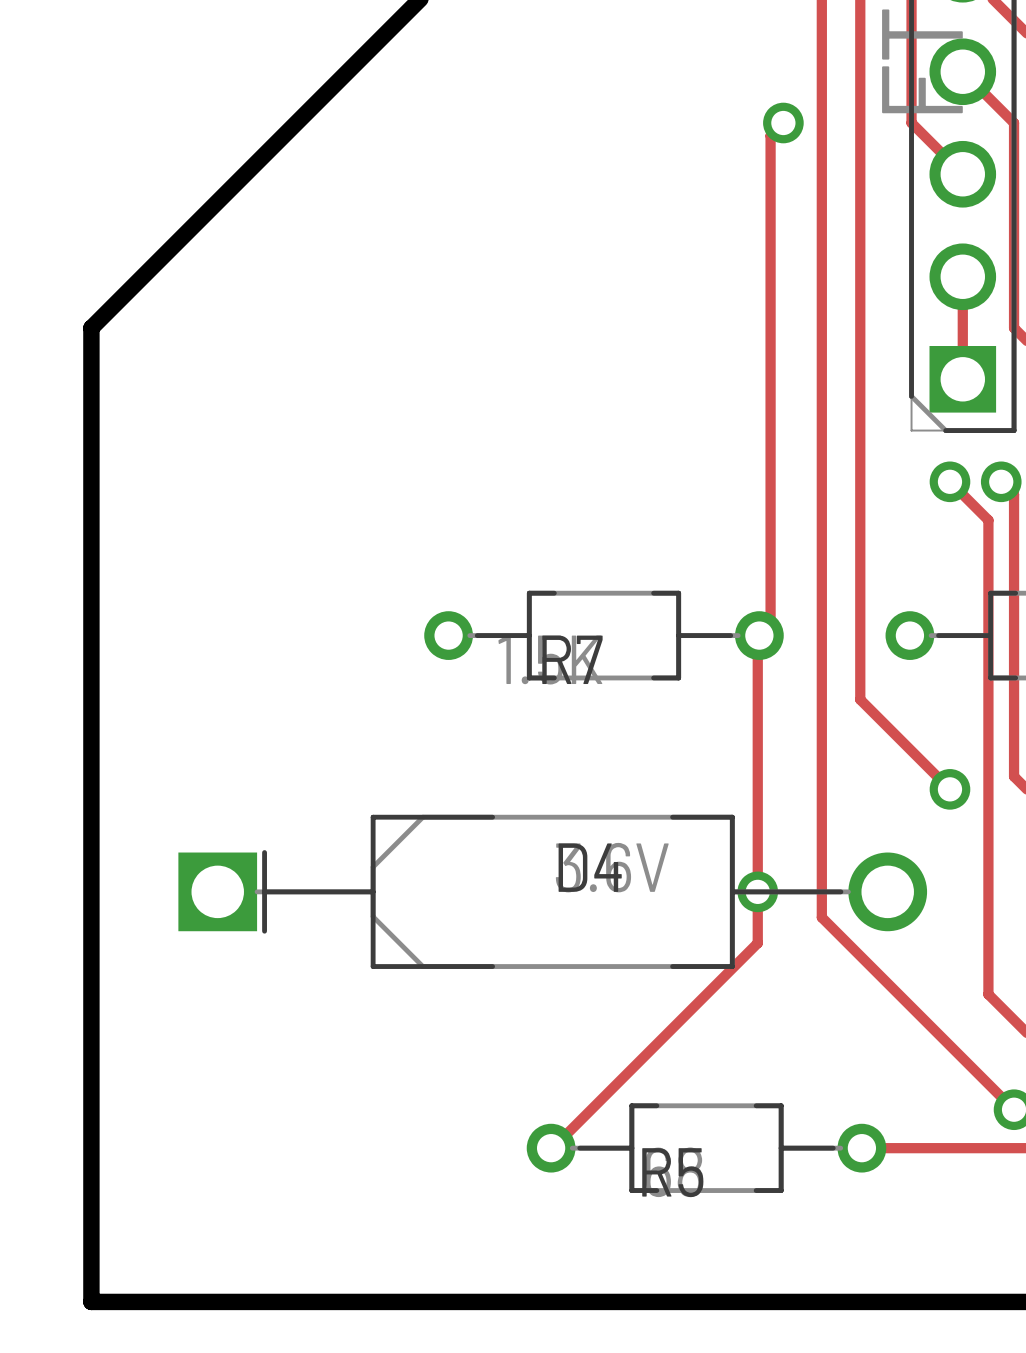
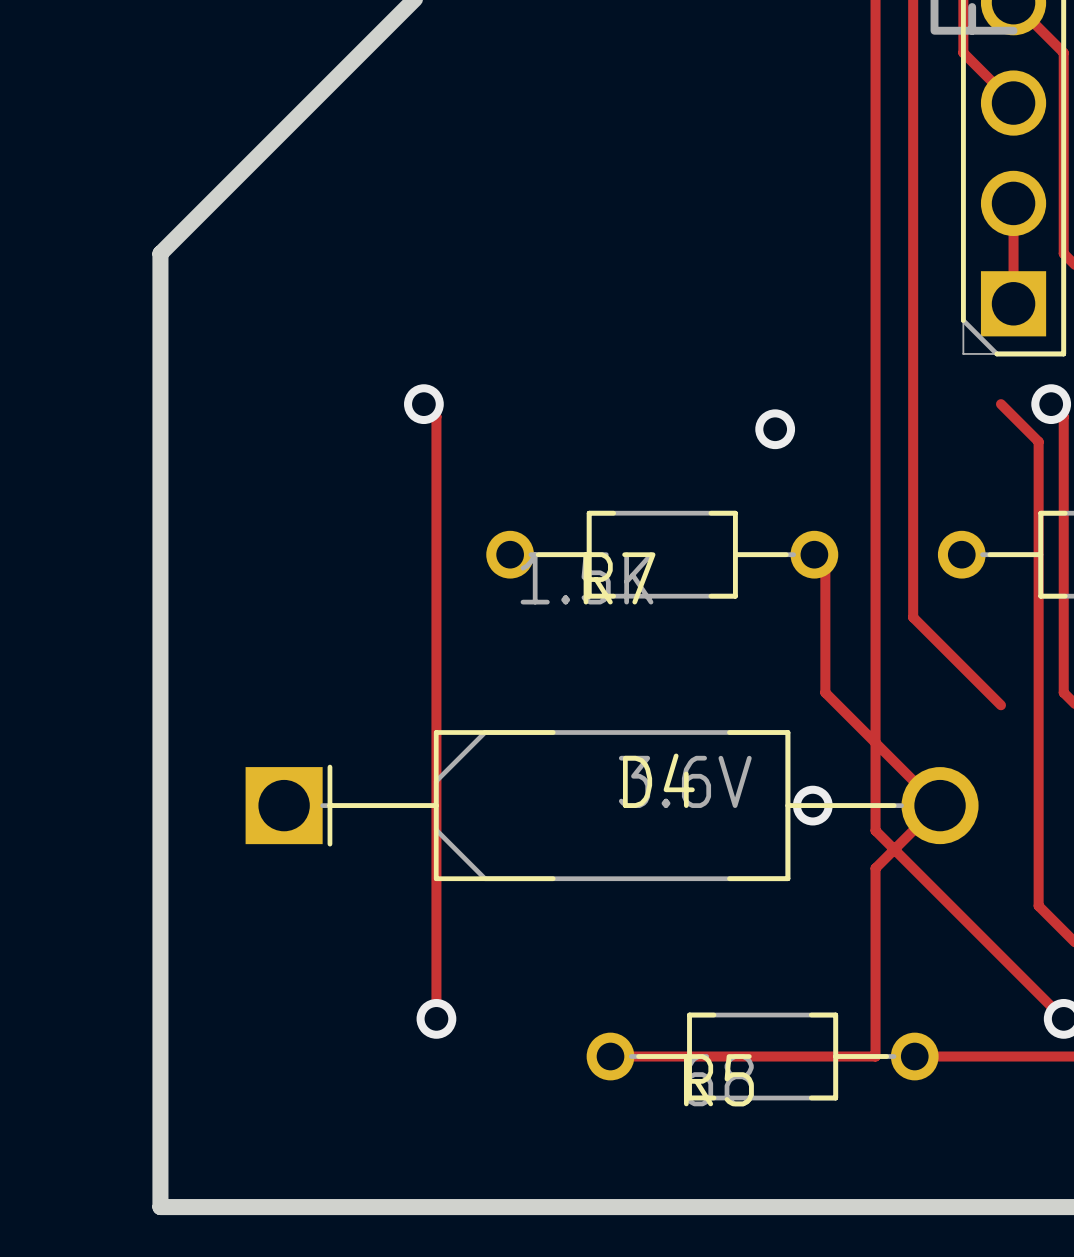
track: (783, 123) (770, 135) (770, 635) -> (938, 805) (825, 692) (825, 554)
via: (783, 123) -> none
track: none -> (423, 404) (436, 416) (436, 1018)
via: none -> (423, 404)
via: (949, 481) -> none
via: none -> (775, 429)
track: (759, 635) (757, 635) (757, 943) (552, 1148) -> (938, 805) (875, 868) (875, 1056) (612, 1056)
via: (949, 789) -> none
via: none -> (436, 1018)

